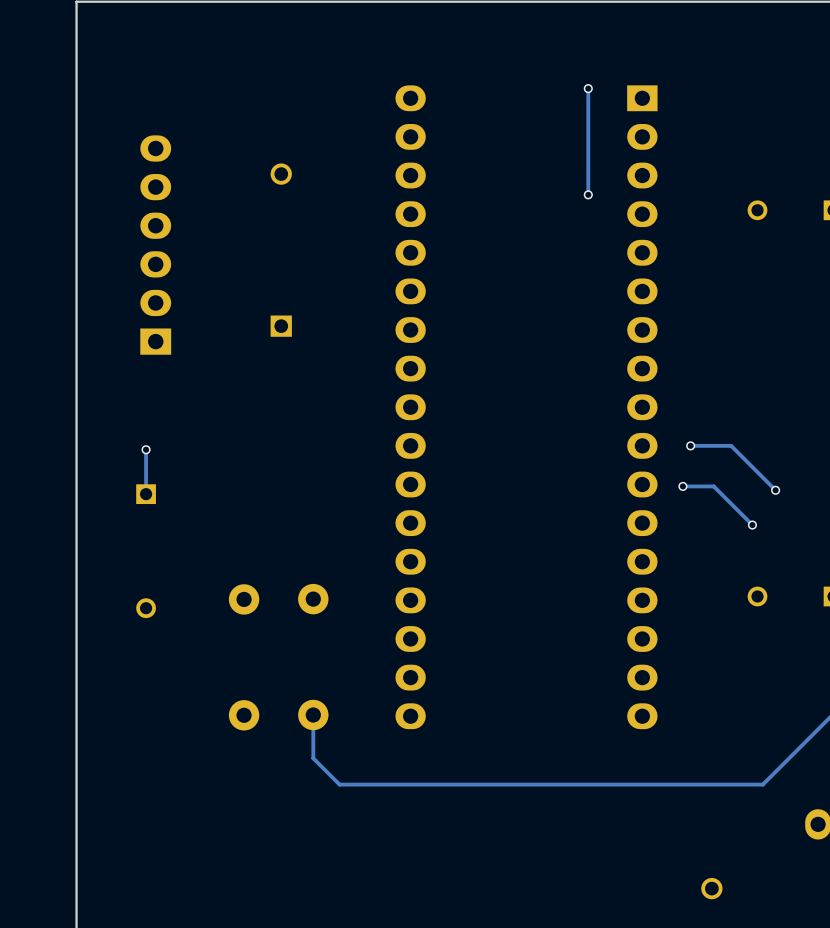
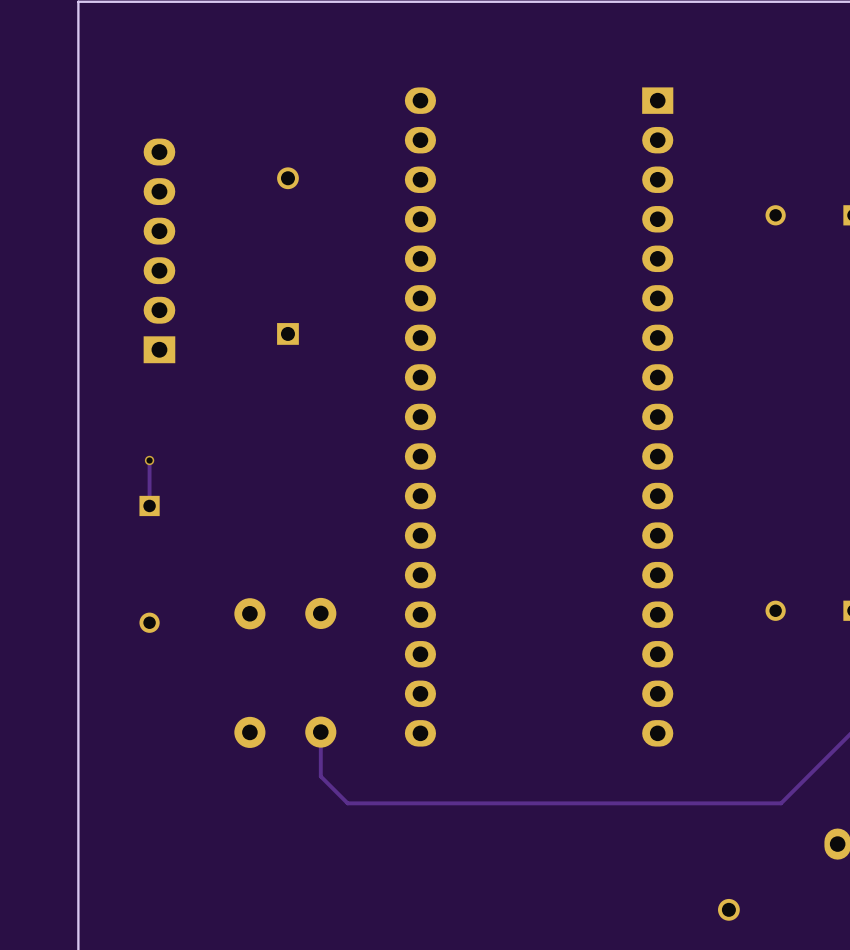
track: (588, 88) (588, 194) -> none
via: (588, 88) -> none
via: (588, 194) -> none
track: (690, 445) (731, 445) (775, 490) -> none
via: (690, 445) -> none
track: (682, 486) (713, 486) (752, 525) -> none
via: (682, 486) -> none
via: (775, 490) -> none
via: (752, 525) -> none

